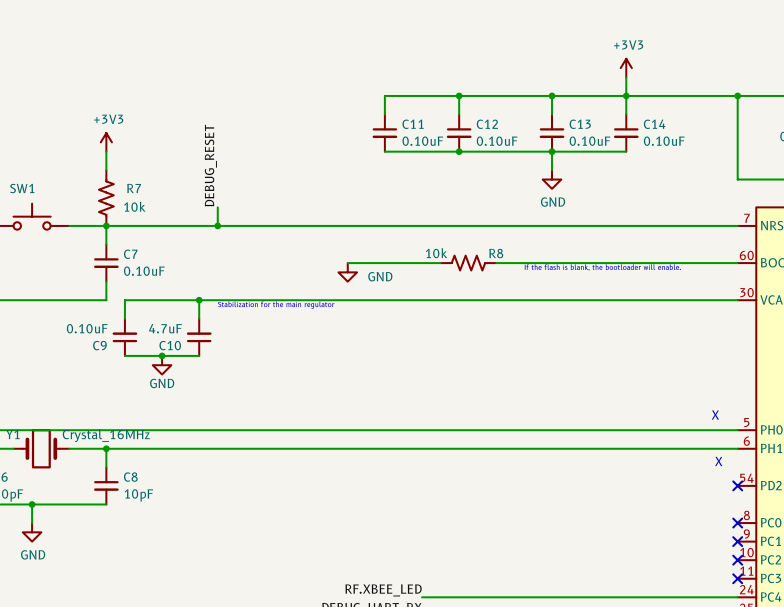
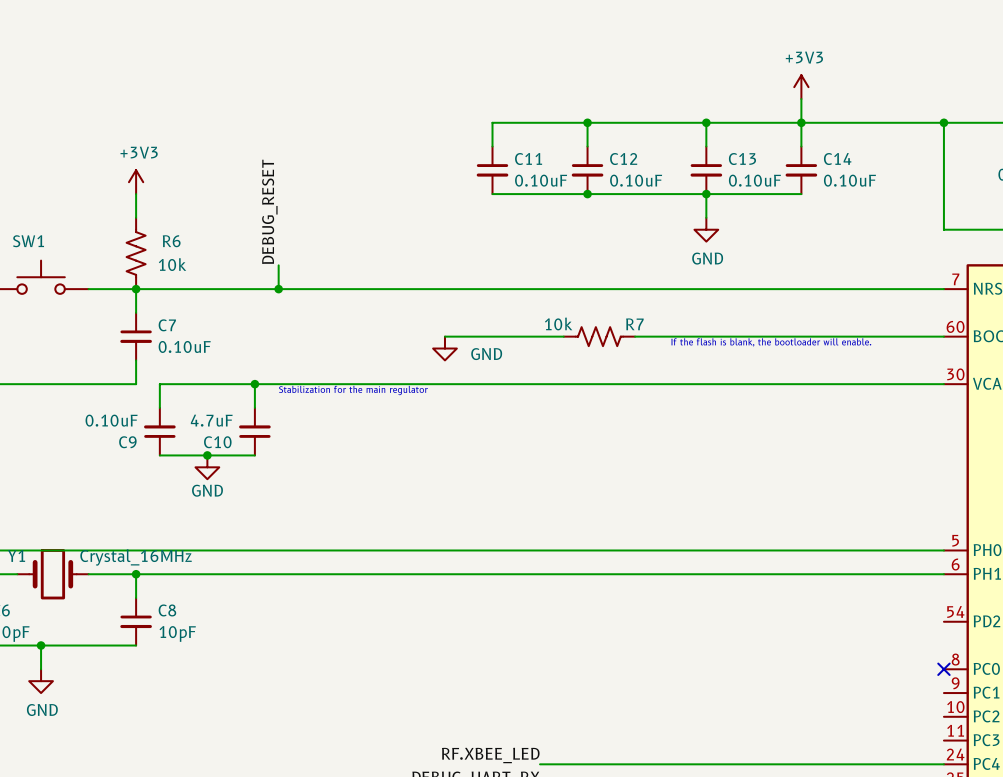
R7 name: R7 (134, 188) -> R6 (171, 241)
R8 name: R8 (496, 253) -> R7 (634, 324)
text: X (715, 415) -> none
text: X (718, 461) -> none
no-connect mark: (737, 485) -> none
no-connect mark: (737, 541) -> none
no-connect mark: (737, 560) -> none
no-connect mark: (737, 578) -> none

